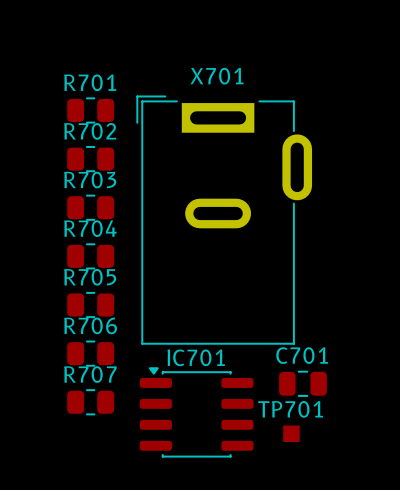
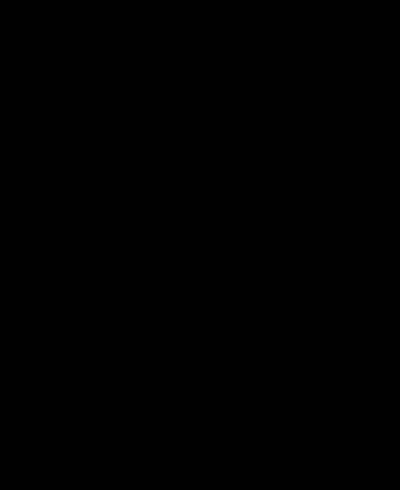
R701: (90, 110) -> none
R702: (90, 159) -> none
R703: (90, 207) -> none
X701: (224, 220) -> none
R704: (90, 256) -> none
R705: (90, 305) -> none
R706: (90, 353) -> none
C701: (302, 383) -> none
R707: (90, 402) -> none
IC701: (196, 412) -> none
TP701: (291, 433) -> none

